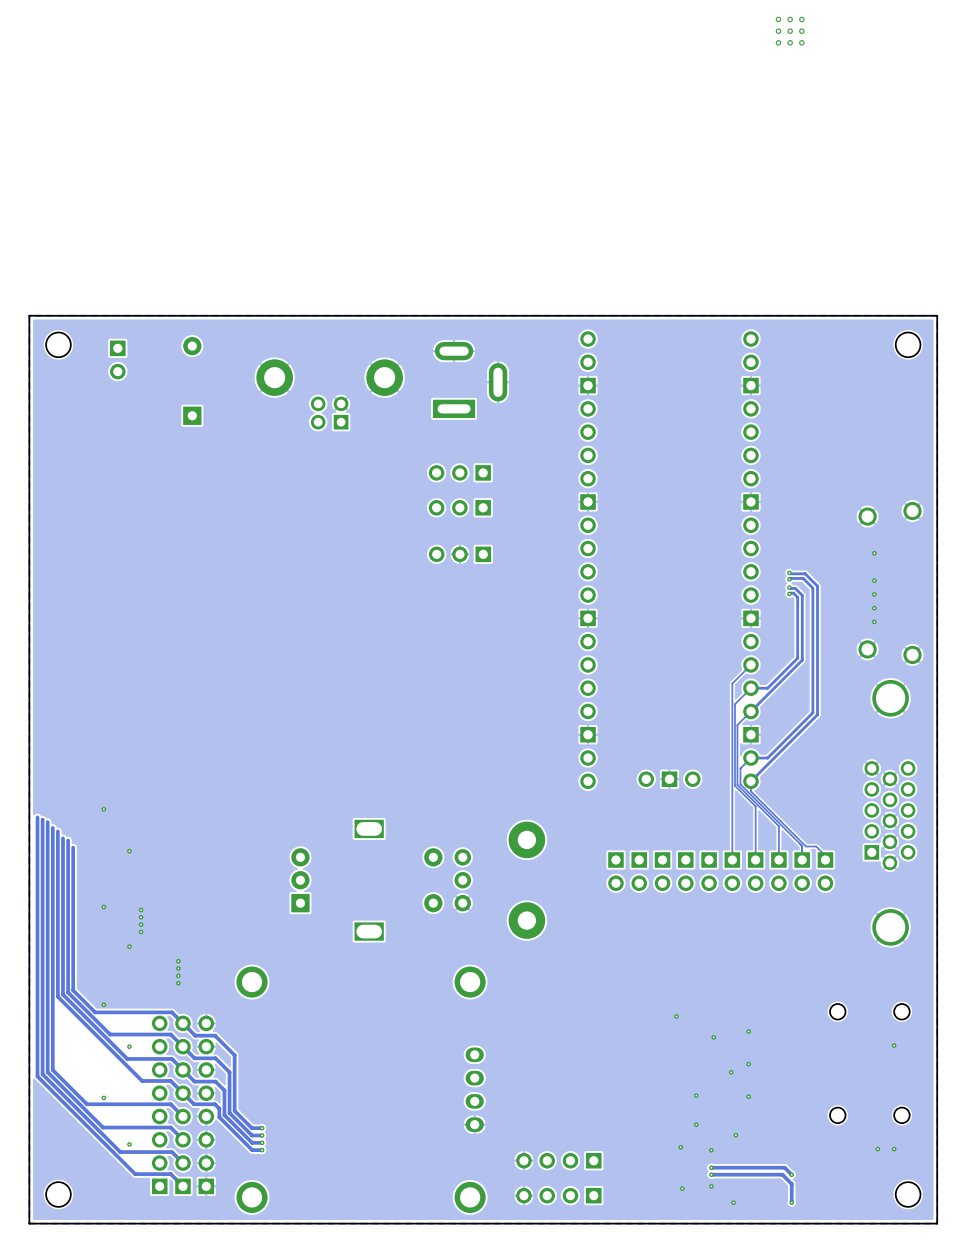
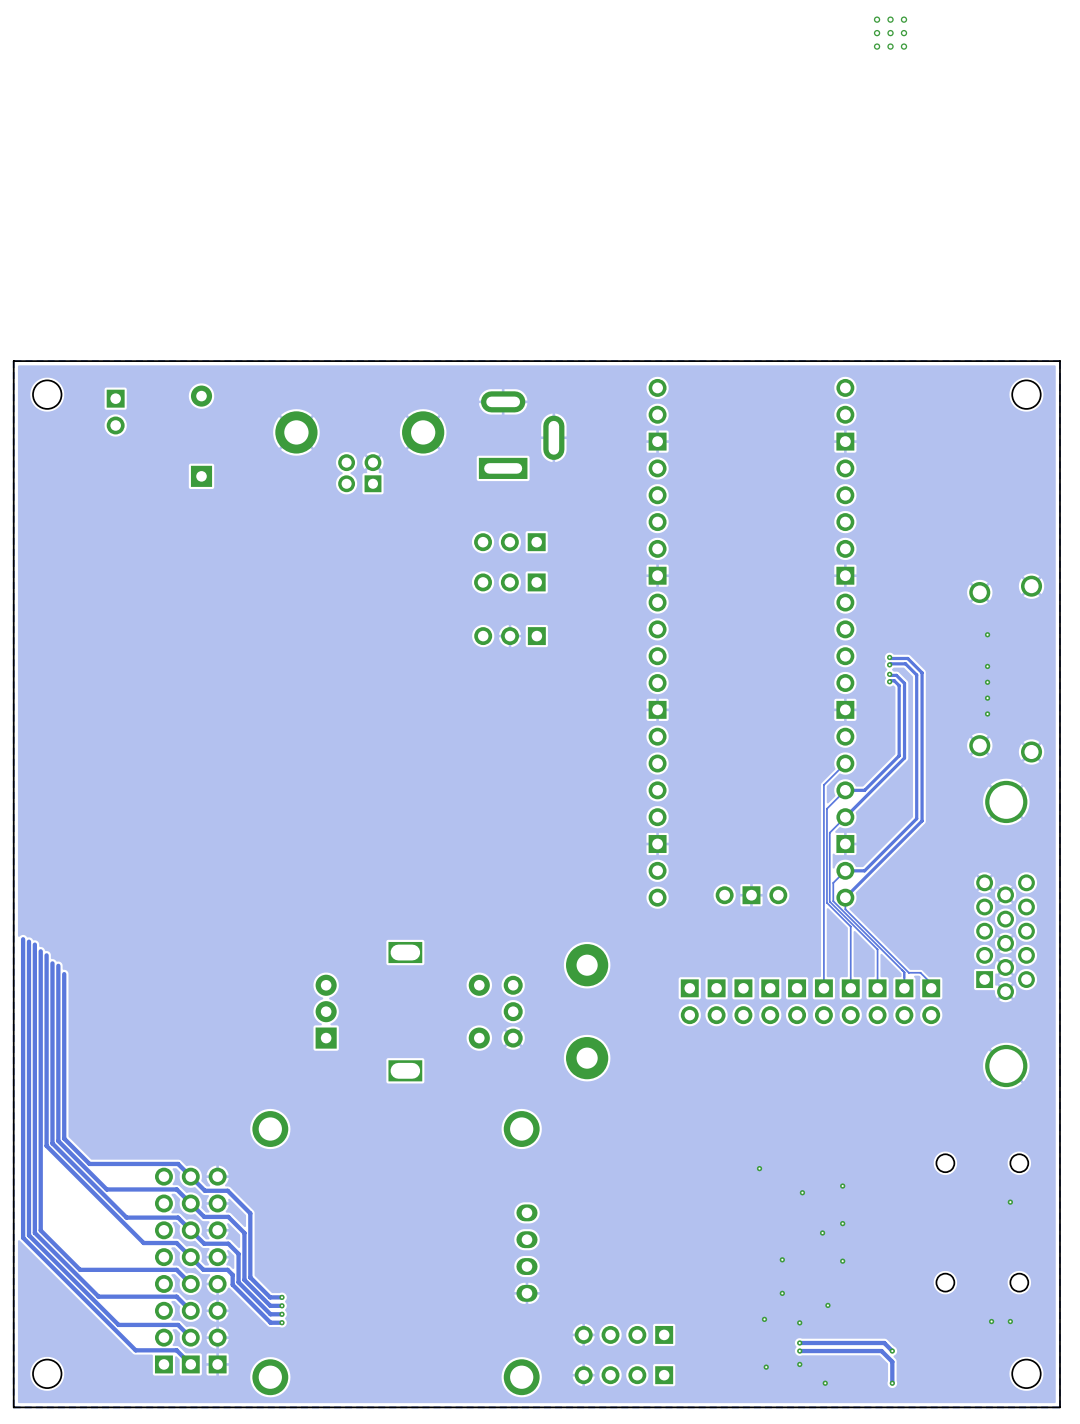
via: (103, 809) -> none
via: (129, 851) -> none
via: (103, 907) -> none
via: (141, 909) -> none
via: (141, 917) -> none
via: (141, 924) -> none
via: (141, 931) -> none
via: (129, 946) -> none
via: (178, 961) -> none
via: (178, 968) -> none
via: (178, 975) -> none
via: (178, 983) -> none
via: (103, 1004) -> none
via: (129, 1046) -> none
via: (103, 1097) -> none
via: (129, 1144) -> none

